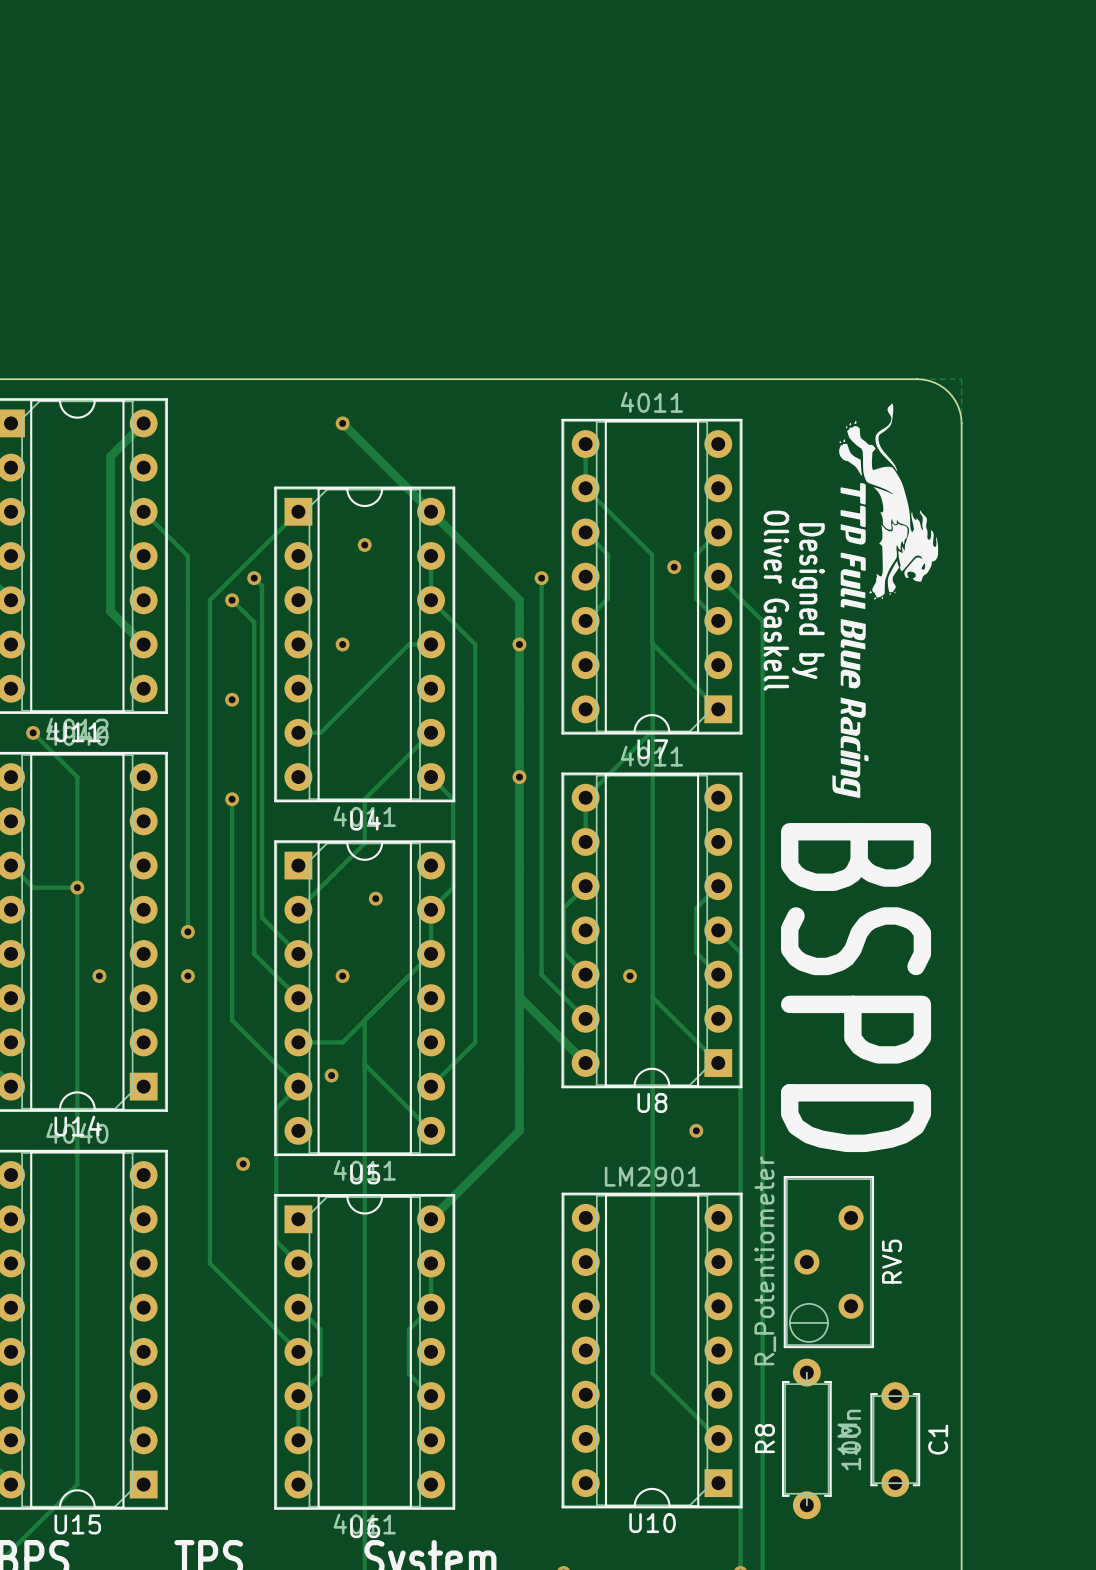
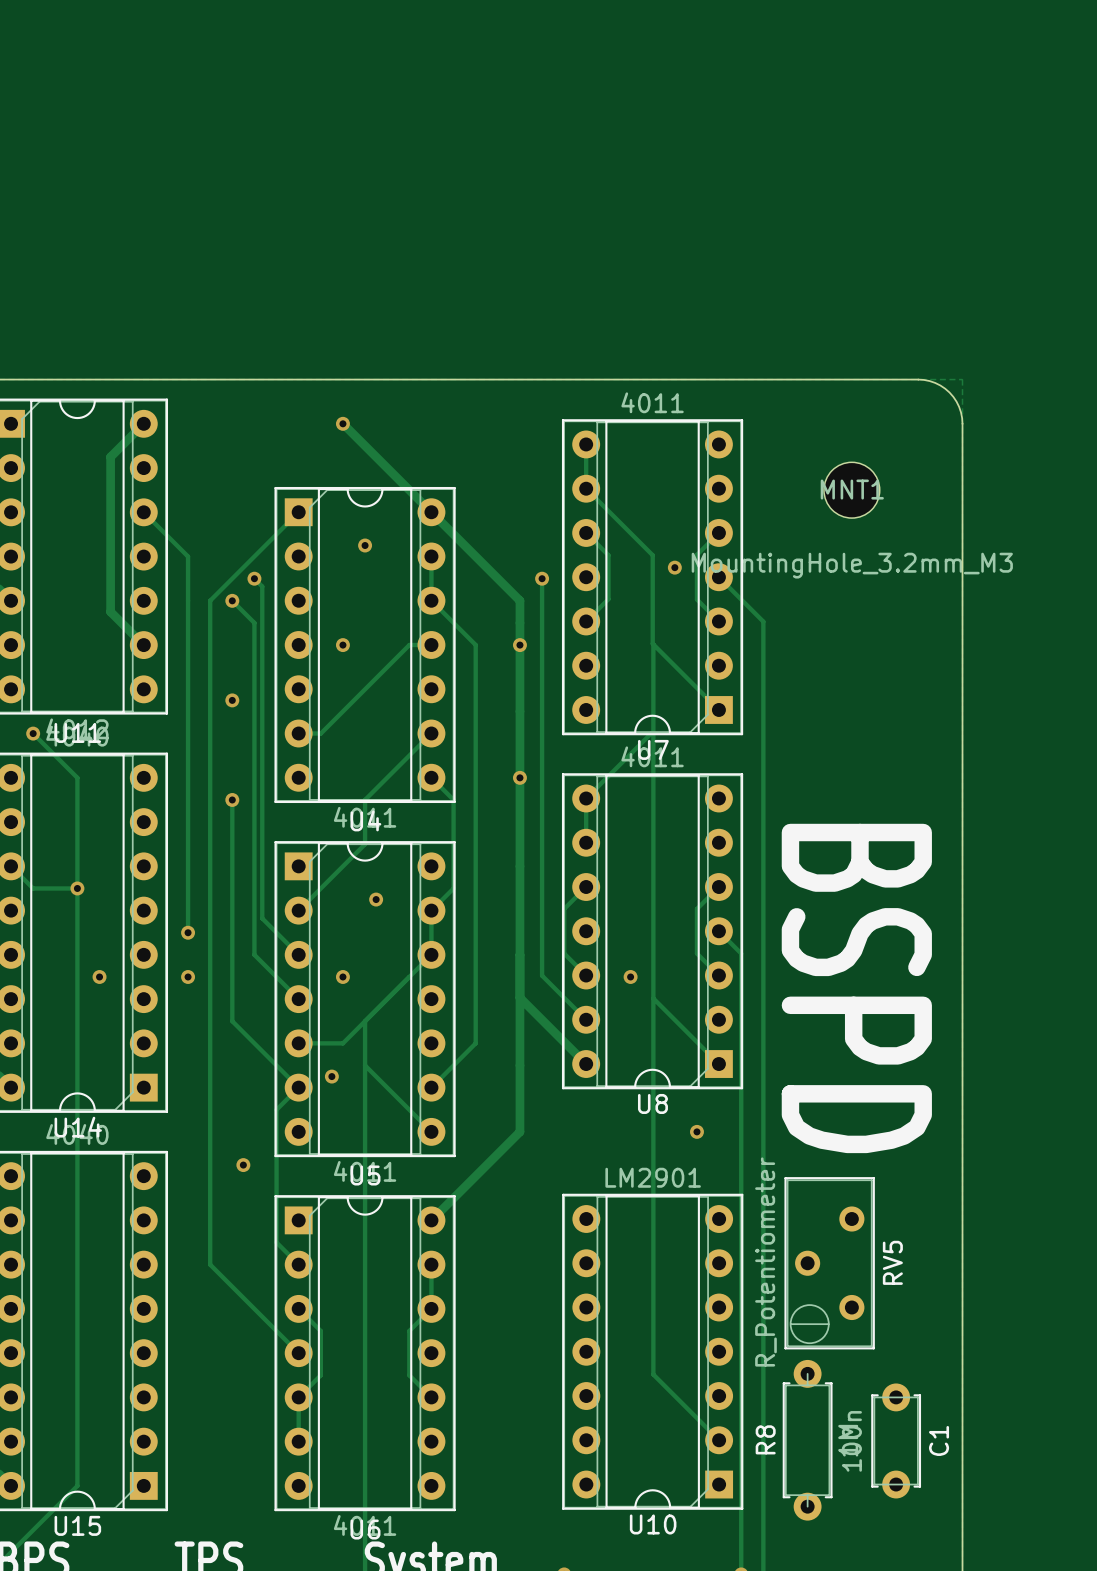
drawing: [832, 403, 939, 799] -> none
MNT1: none -> MountingHole_3.2mm_M3 (851, 490)
text: Oliver Gaskell (776, 600) -> none
text: Designed by (808, 601) -> none

